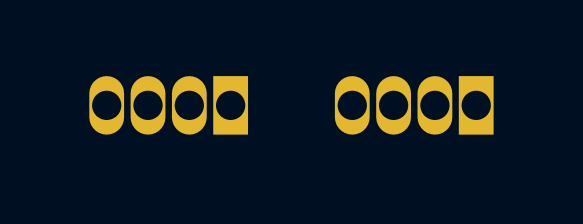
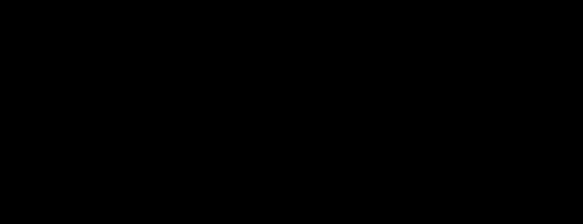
part: (168, 105) -> none
part: (414, 105) -> none

